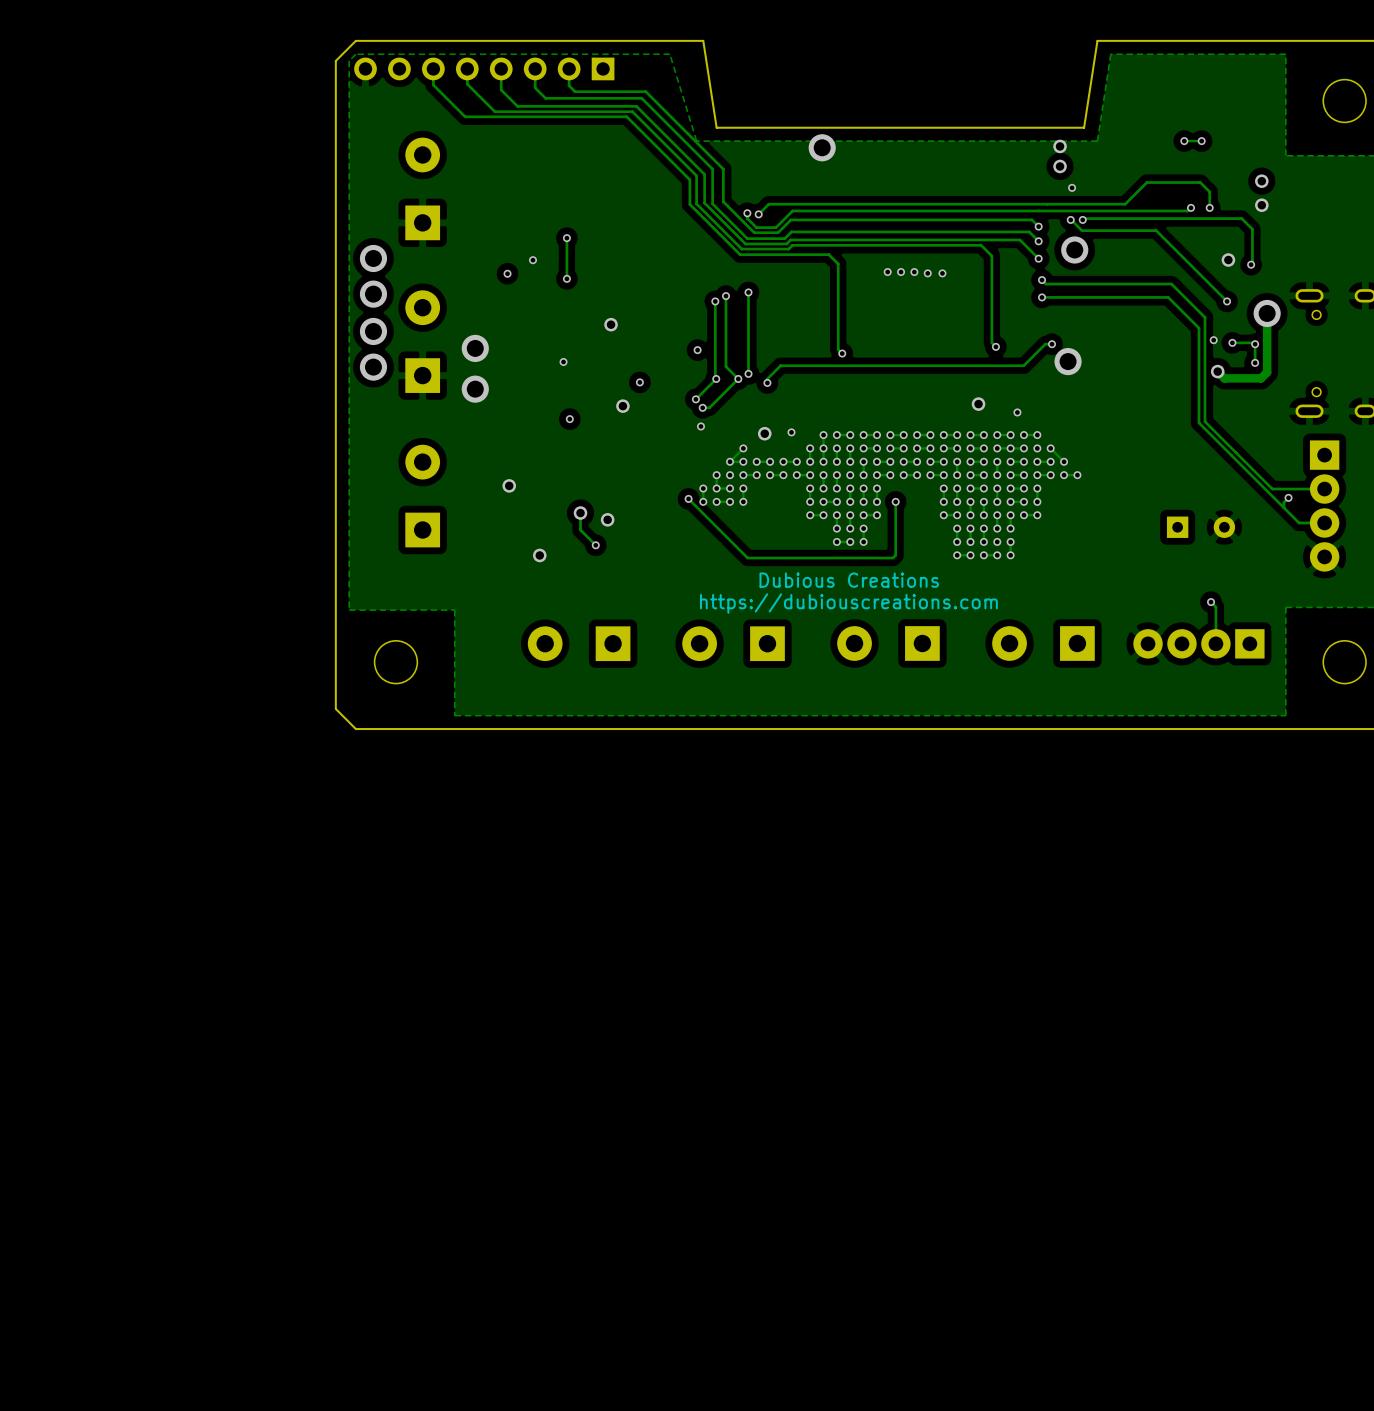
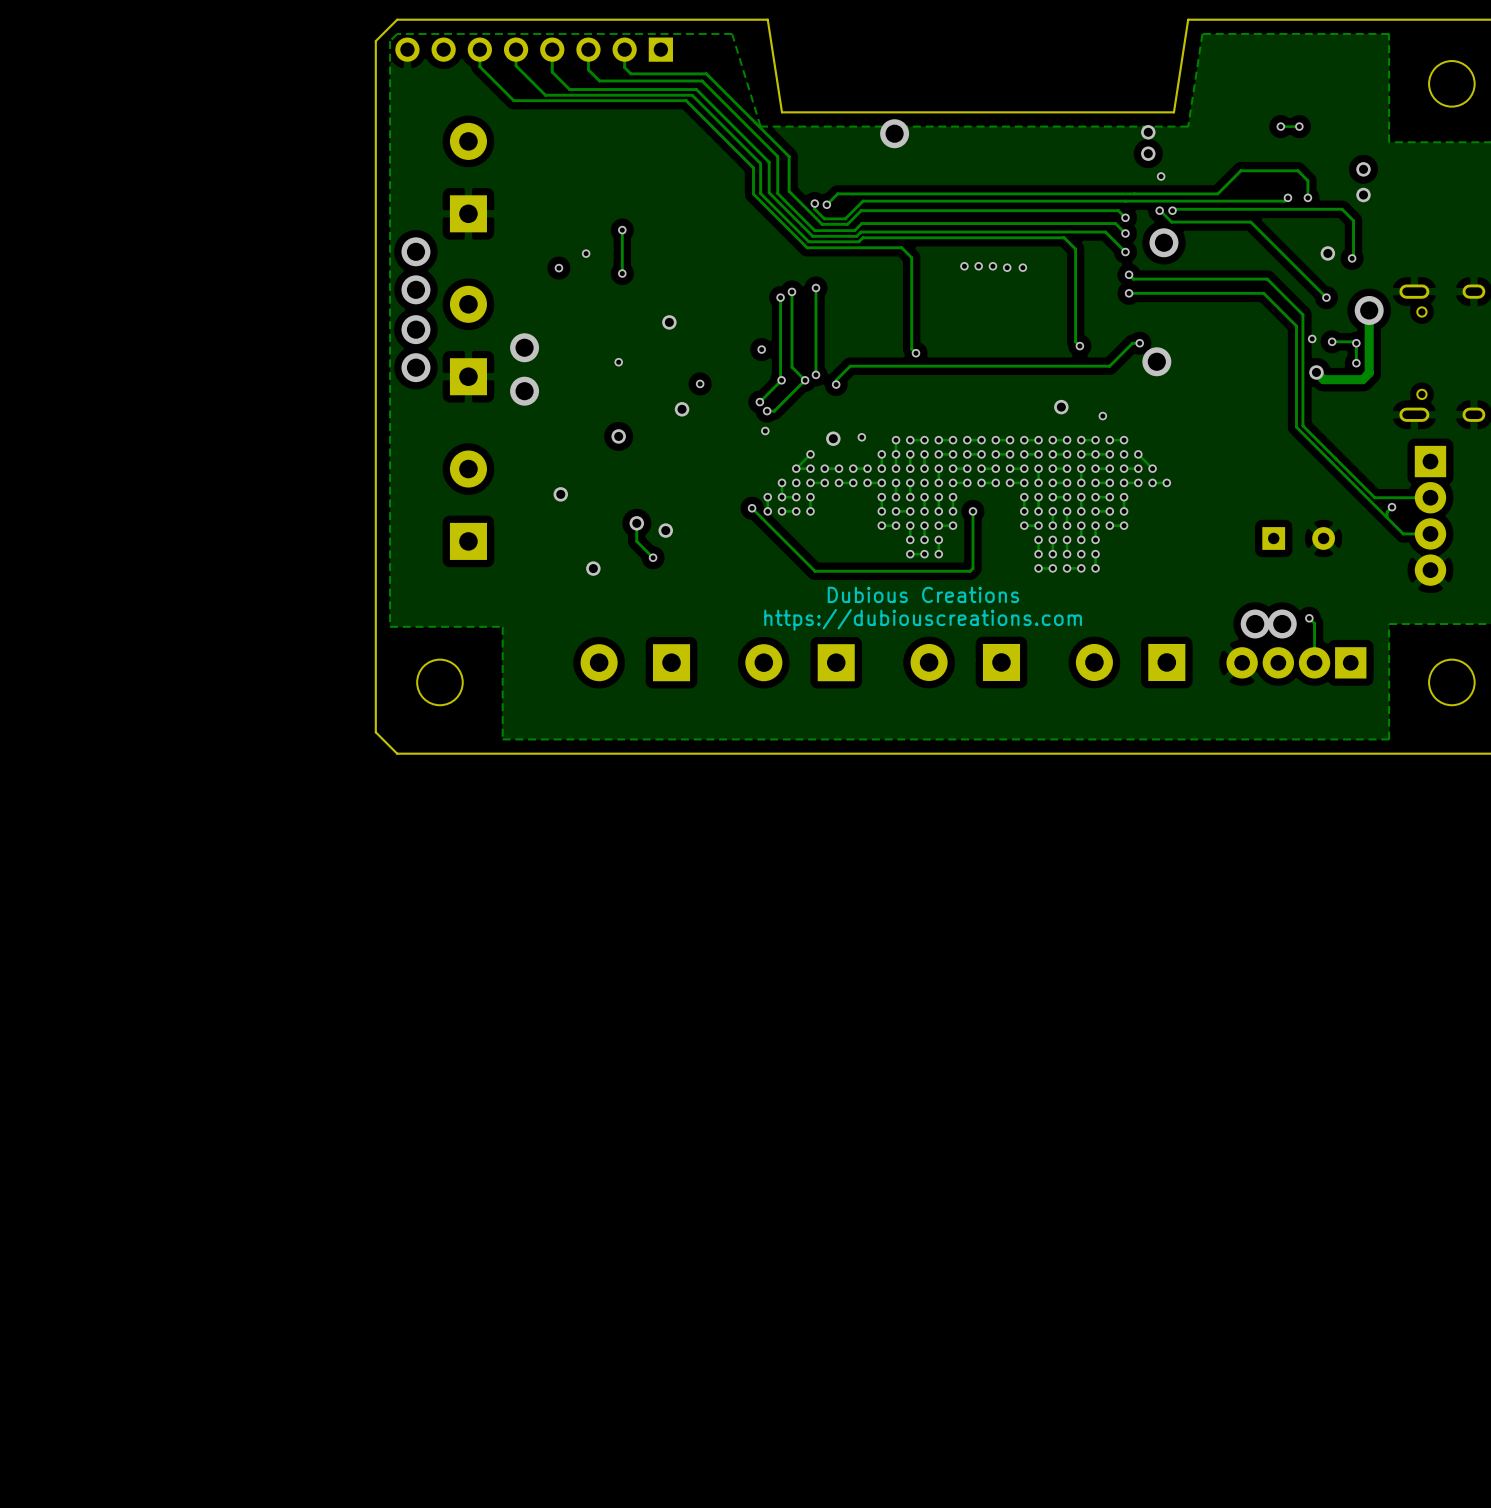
via: (569, 419) -> none
via: none -> (618, 436)
via: none -> (1255, 624)
via: none -> (1282, 624)

